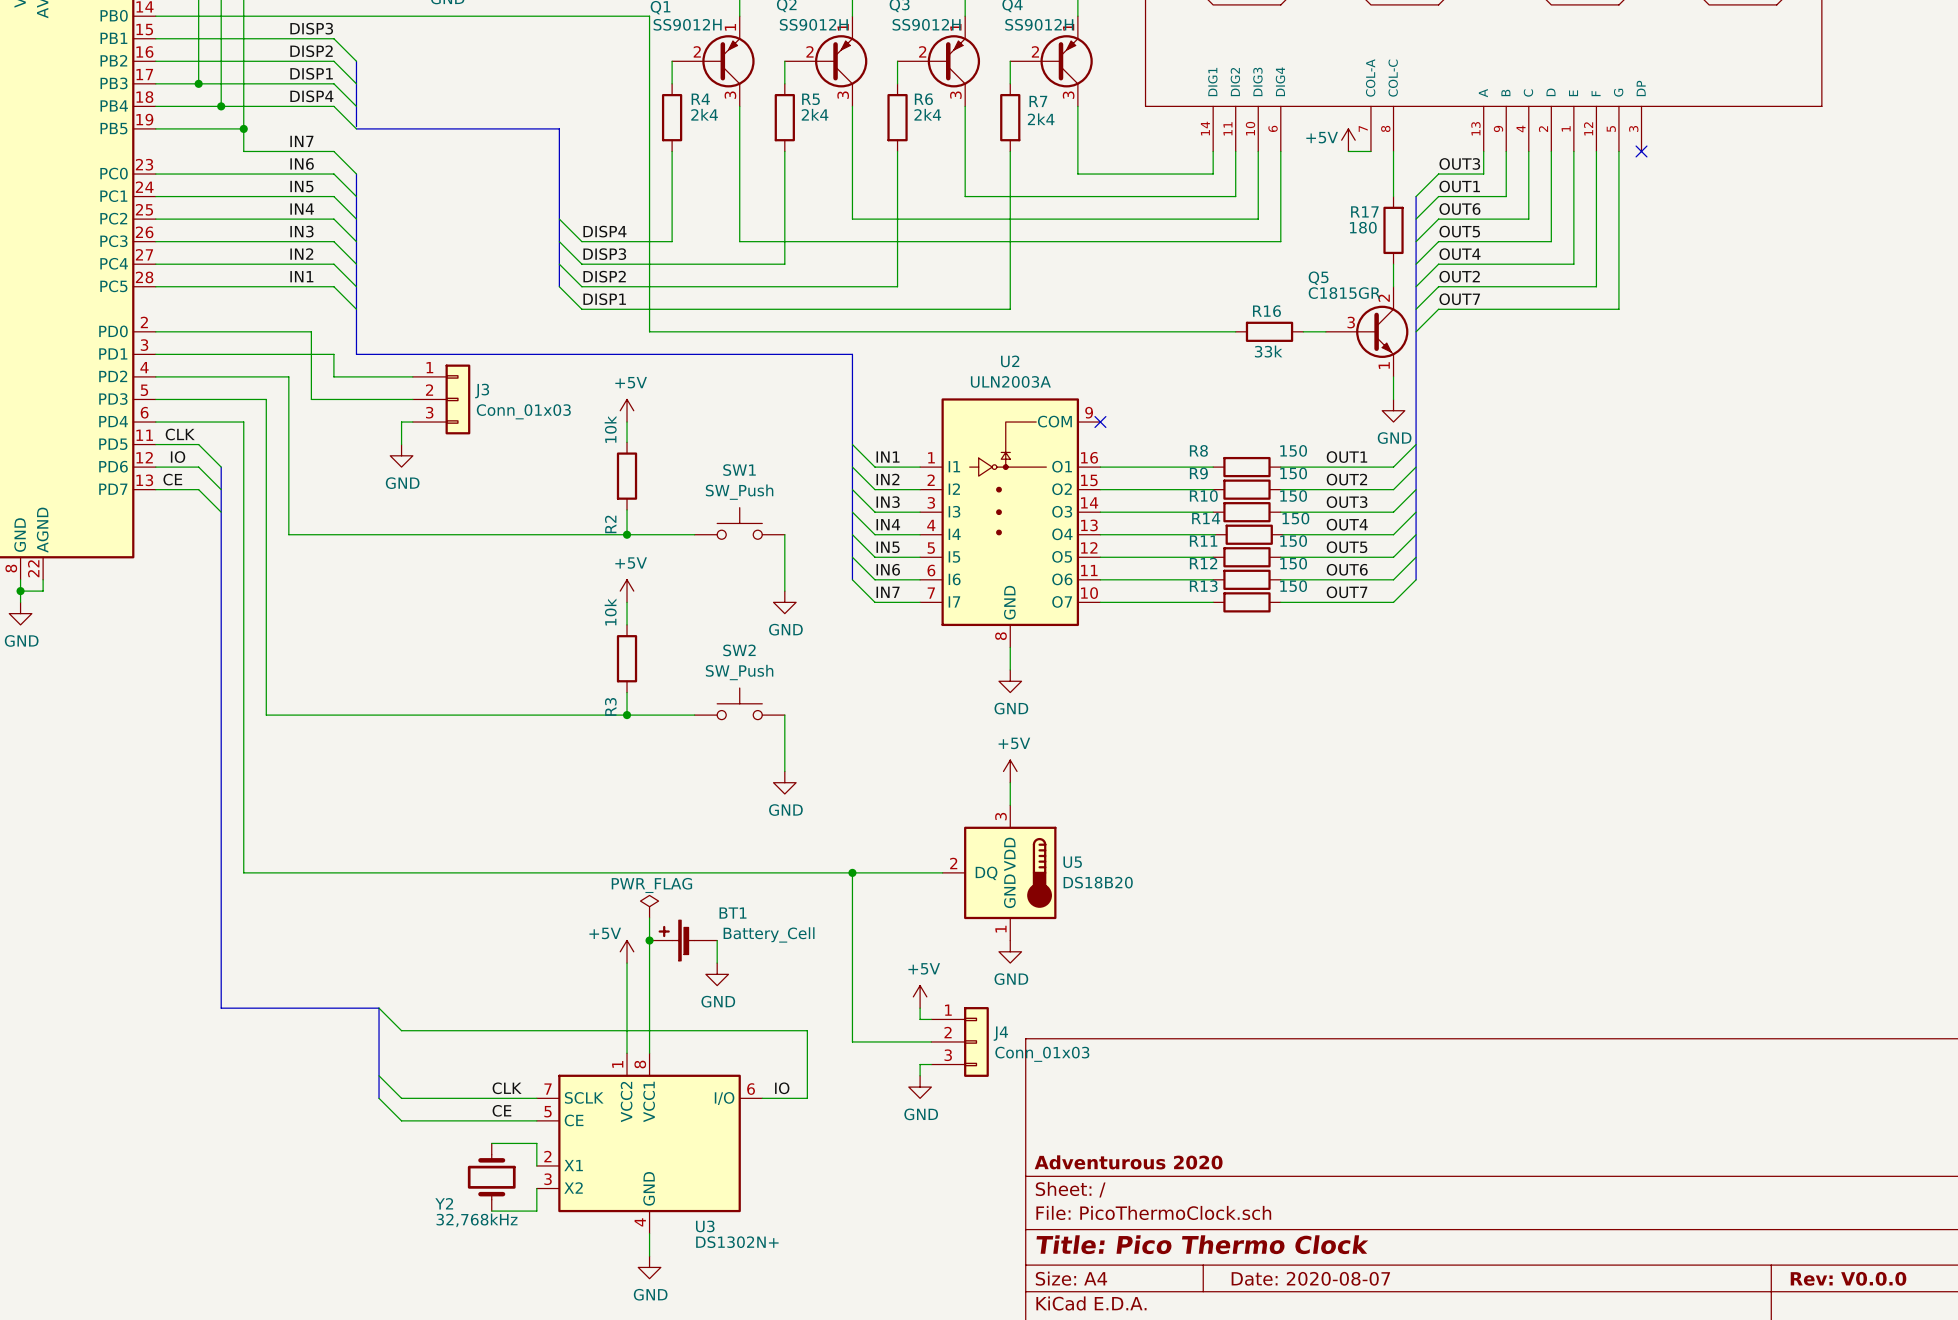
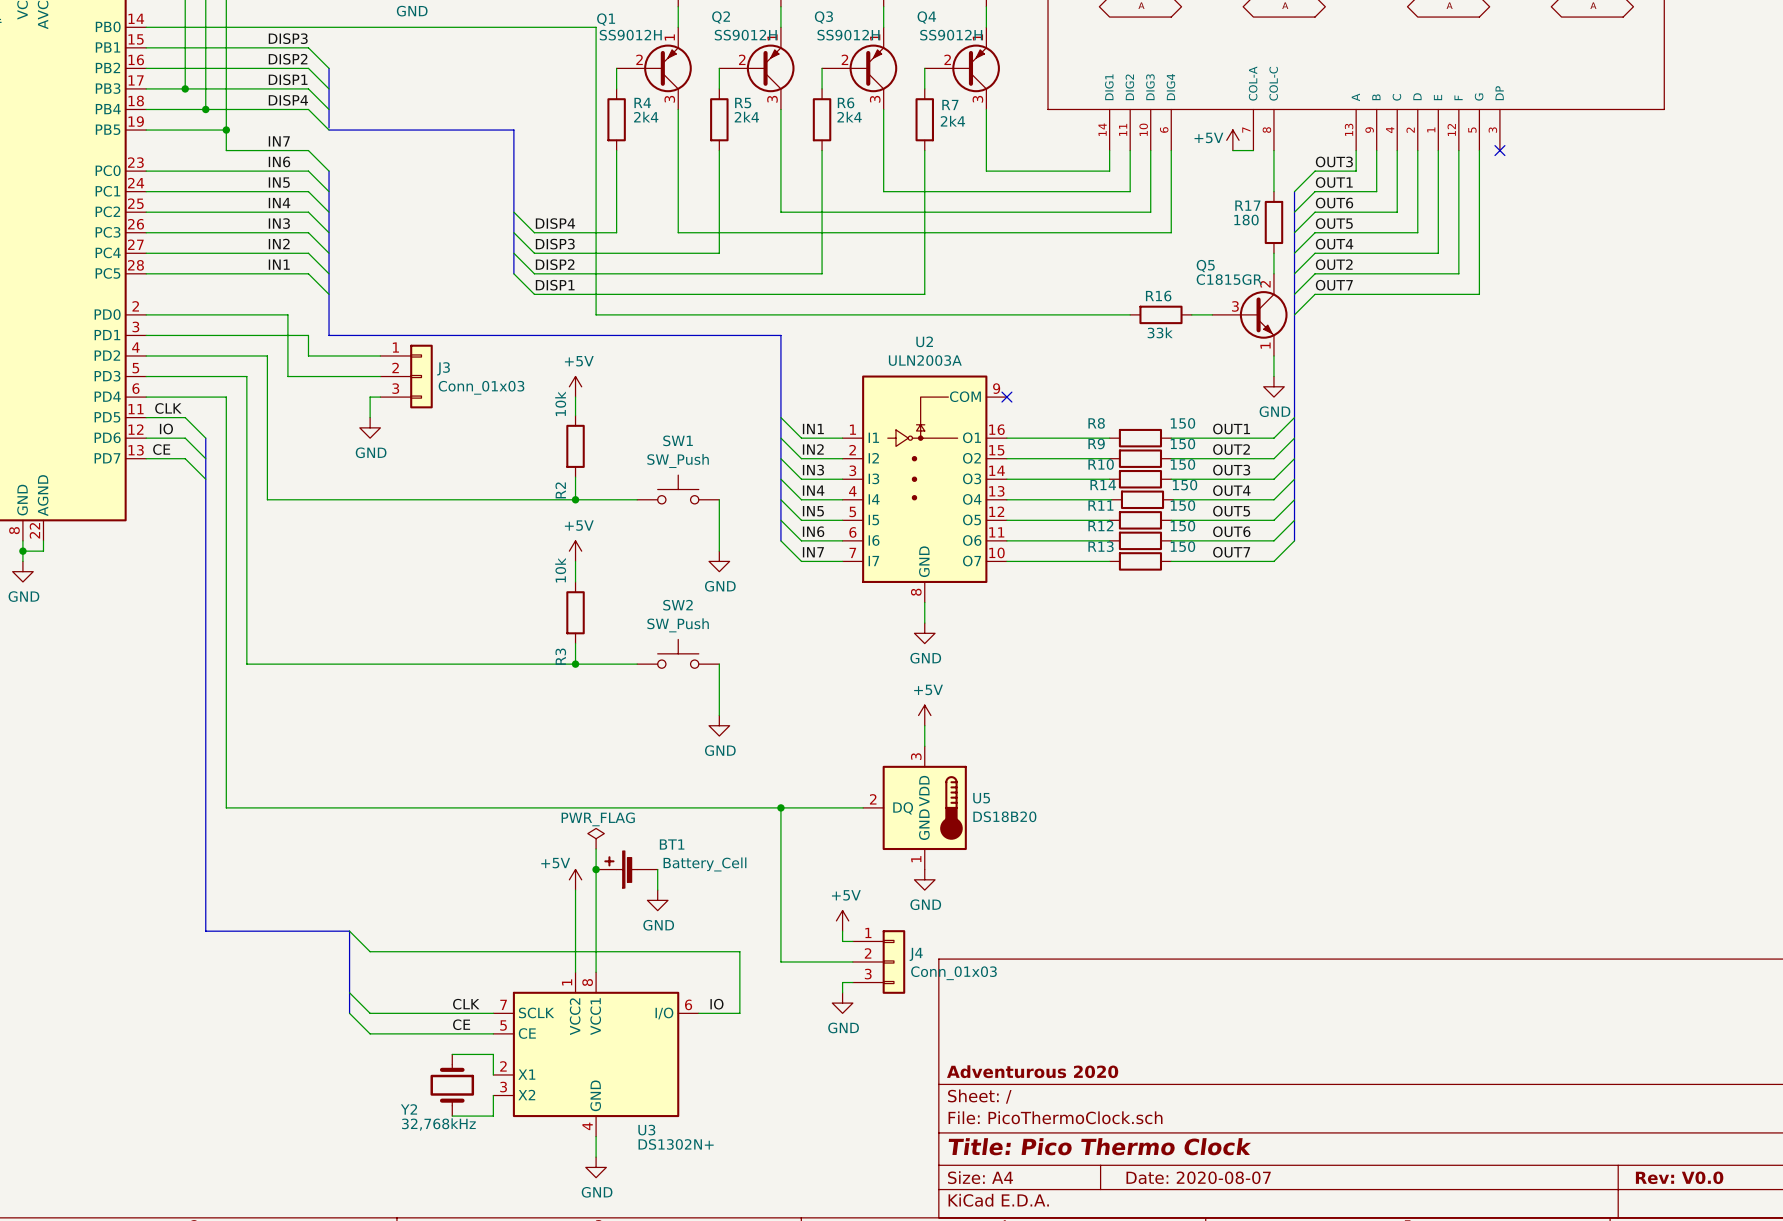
title block: Rev: V0.0.0 (1848, 1278) -> Rev: V0.0 (1679, 1177)

